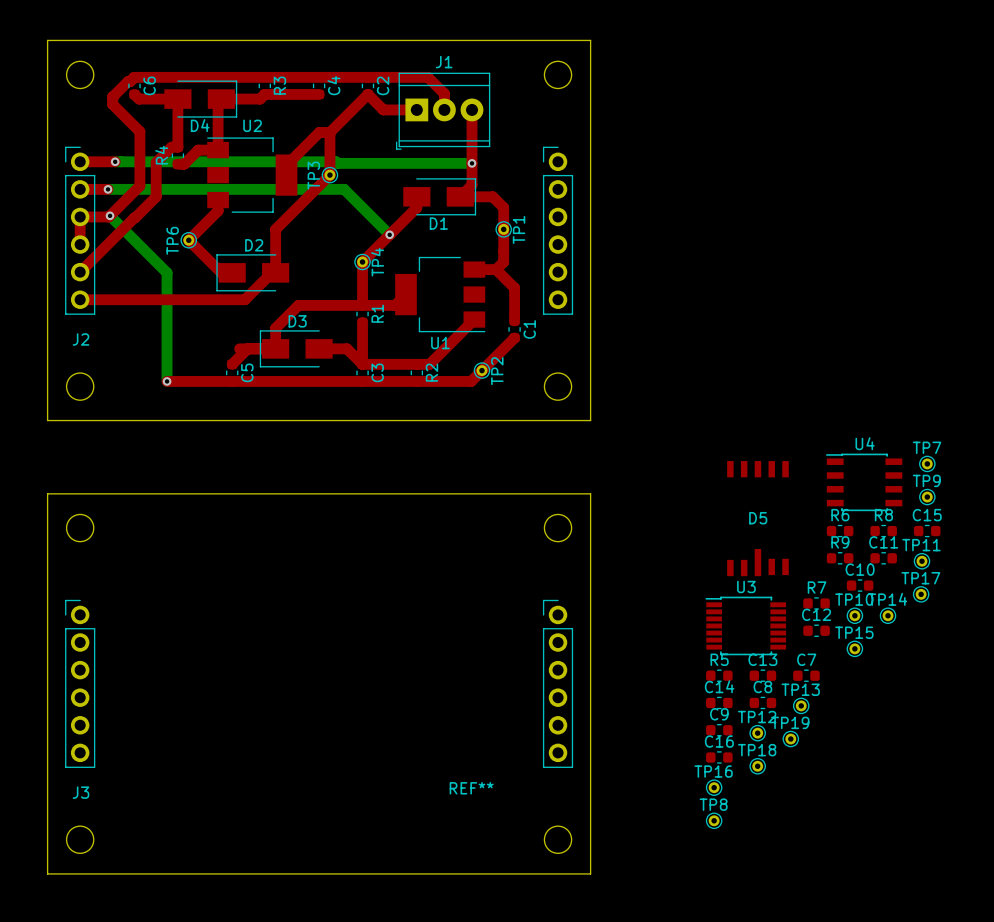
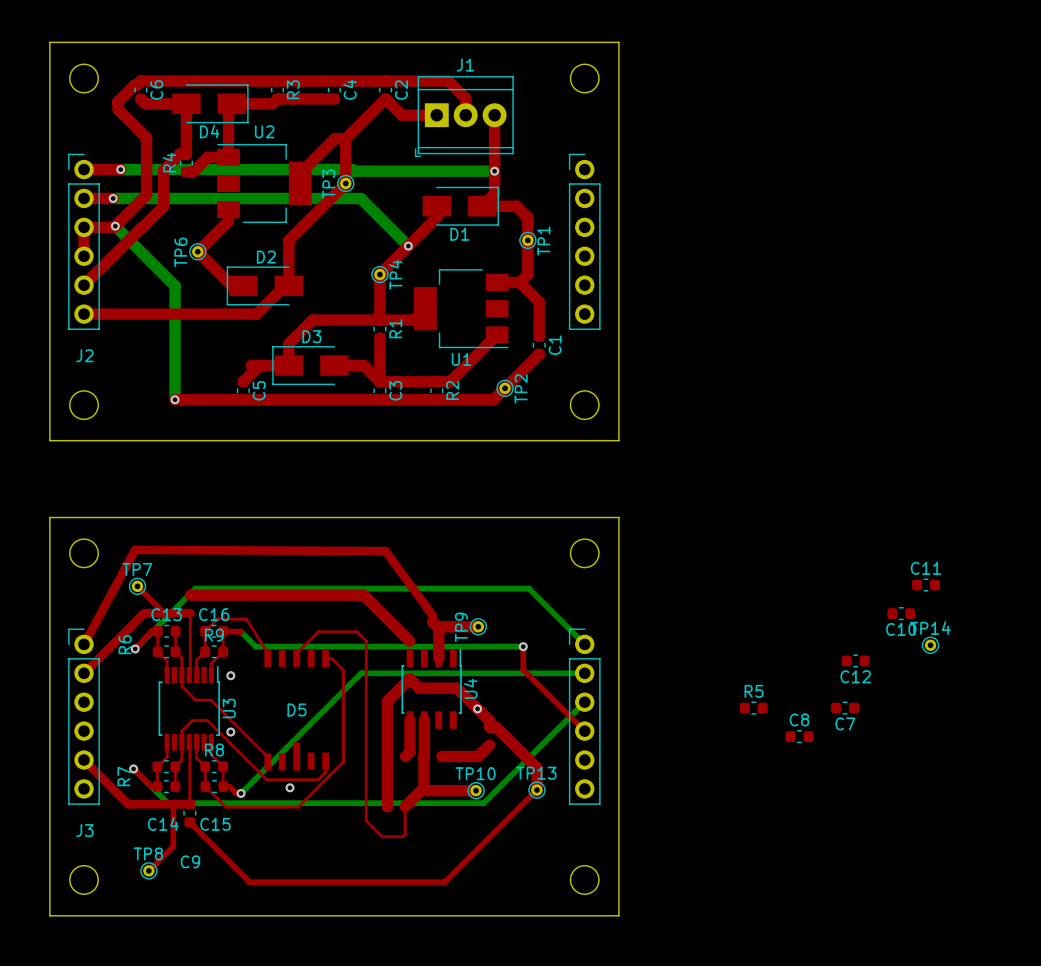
TP7 position: (927, 463) -> (137, 586)
TP9 name rotation: 0° (926, 480) -> 90° counterclockwise (461, 627)
U4 rotation: 0° (864, 482) -> 90° clockwise (431, 688)
U4 position: (864, 482) -> (431, 688)
TP9 position: (927, 497) -> (478, 626)
R6 name rotation: 0° (840, 515) -> 90° counterclockwise (125, 644)
R6 name position: R6 (840, 515) -> R6 (125, 644)
C15 name position: C15 (927, 515) -> C15 (215, 824)
D5 position: (757, 518) -> (296, 710)
R6 position: (840, 531) -> (166, 651)
R8 position: (883, 531) -> (214, 766)
C15 position: (927, 531) -> (214, 786)
R9 position: (840, 558) -> (214, 651)
top track: none -> (137, 586) (164, 613) (172, 613)
TP11: (922, 561) -> none
top track: none -> (190, 595) (363, 595) (409, 641)
C10 name position: C10 (860, 569) -> C10 (901, 629)
R7 name rotation: 0° (817, 587) -> 90° counterclockwise (123, 776)
R7 name position: R7 (817, 587) -> R7 (123, 776)
TP17: (921, 594) -> none
top track: none -> (437, 626) (478, 626)
top track: none -> (175, 631) (175, 651) (181, 658) (181, 686) (195, 700) (210, 700) (267, 757) (267, 762)
top track: none -> (240, 631) (223, 631) (223, 651) (211, 663) (211, 675)
bottom track: none -> (241, 631) (255, 646) (523, 646)
R7 position: (816, 603) -> (166, 766)
top track: none -> (84, 644) (135, 549) (385, 551) (432, 615) (432, 622) (438, 628) (438, 658)
bottom track: none -> (584, 644) (528, 588) (195, 588) (135, 648)
C12 name position: C12 (816, 614) -> C12 (855, 676)
TP10 position: (854, 615) -> (476, 790)
top track: none -> (523, 646) (523, 669) (584, 731)
via: none -> (523, 646)
top track: none -> (135, 647) (151, 631) (157, 631) (157, 651) (167, 661) (167, 675)
via: none -> (135, 648)
U3 rotation: 0° (745, 625) -> 90° clockwise (189, 708)
U3 position: (745, 625) -> (189, 708)
top track: none -> (267, 658) (267, 653) (246, 619) (217, 618) (205, 631) (205, 651) (196, 660) (196, 675)
top track: none -> (296, 658) (296, 653) (318, 631) (357, 631) (366, 640) (366, 820) (382, 836) (402, 836) (405, 834) (405, 806) (424, 787)
top track: none -> (325, 658) (331, 658) (343, 670) (343, 761) (298, 807) (225, 807) (205, 786) (205, 766) (196, 758) (196, 742)
top track: none -> (84, 673) (144, 613) (190, 613) (189, 675)
bottom track: none -> (584, 673) (361, 673) (241, 793)
via: none -> (230, 675)
TP15: (854, 648) -> none
C7 name position: C7 (806, 659) -> C7 (845, 723)
bottom track: none -> (584, 702) (483, 803) (167, 803) (133, 768)
C13 position: (762, 675) -> (166, 631)
via: none -> (477, 708)
C14 name position: C14 (719, 686) -> C14 (163, 824)
top track: none -> (409, 720) (409, 752) (405, 756)
top track: none -> (424, 720) (424, 787)
via: none -> (230, 732)
C14 position: (719, 702) -> (166, 786)
TP13 position: (801, 705) -> (536, 790)
top track: none -> (167, 742) (167, 757) (157, 766) (157, 786) (151, 786) (132, 768)
top track: none -> (189, 742) (189, 804) (128, 804) (84, 760)
top track: none -> (211, 742) (211, 755) (223, 766) (223, 786) (229, 786) (236, 793) (241, 793)
top track: none -> (489, 745) (478, 756) (441, 756)
C9 name position: C9 (719, 714) -> C9 (190, 861)
top track: none -> (325, 761) (325, 772) (318, 779) (266, 779) (207, 720) (192, 720) (181, 731) (181, 760) (175, 766) (175, 786)
C9 rotation: 0° (719, 730) -> 90° clockwise (189, 813)
C9 position: (719, 730) -> (189, 813)
via: none -> (133, 768)
TP12: (757, 733) -> none
TP19: (790, 739) -> none
via: none -> (290, 787)
top track: none -> (424, 787) (426, 790) (476, 790)
via: none -> (241, 793)
C16 position: (719, 757) -> (214, 631)
TP18: (757, 766) -> none
top track: none -> (173, 804) (173, 846) (148, 870)
top track: none -> (387, 806) (387, 701) (409, 678) (419, 688) (456, 688) (489, 721) (489, 727) (496, 727) (536, 767) (536, 790) (444, 882) (249, 882) (189, 822)
TP16: (714, 787) -> none
J3 text: REF** (471, 788) -> none
TP8 position: (714, 820) -> (148, 870)

